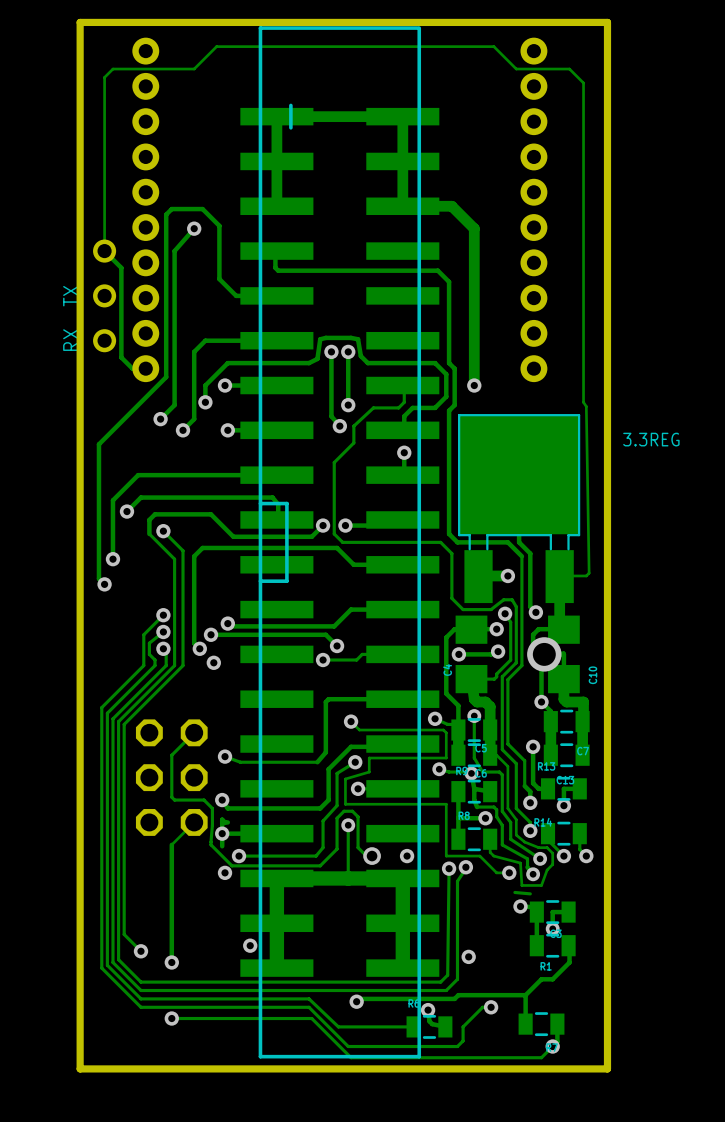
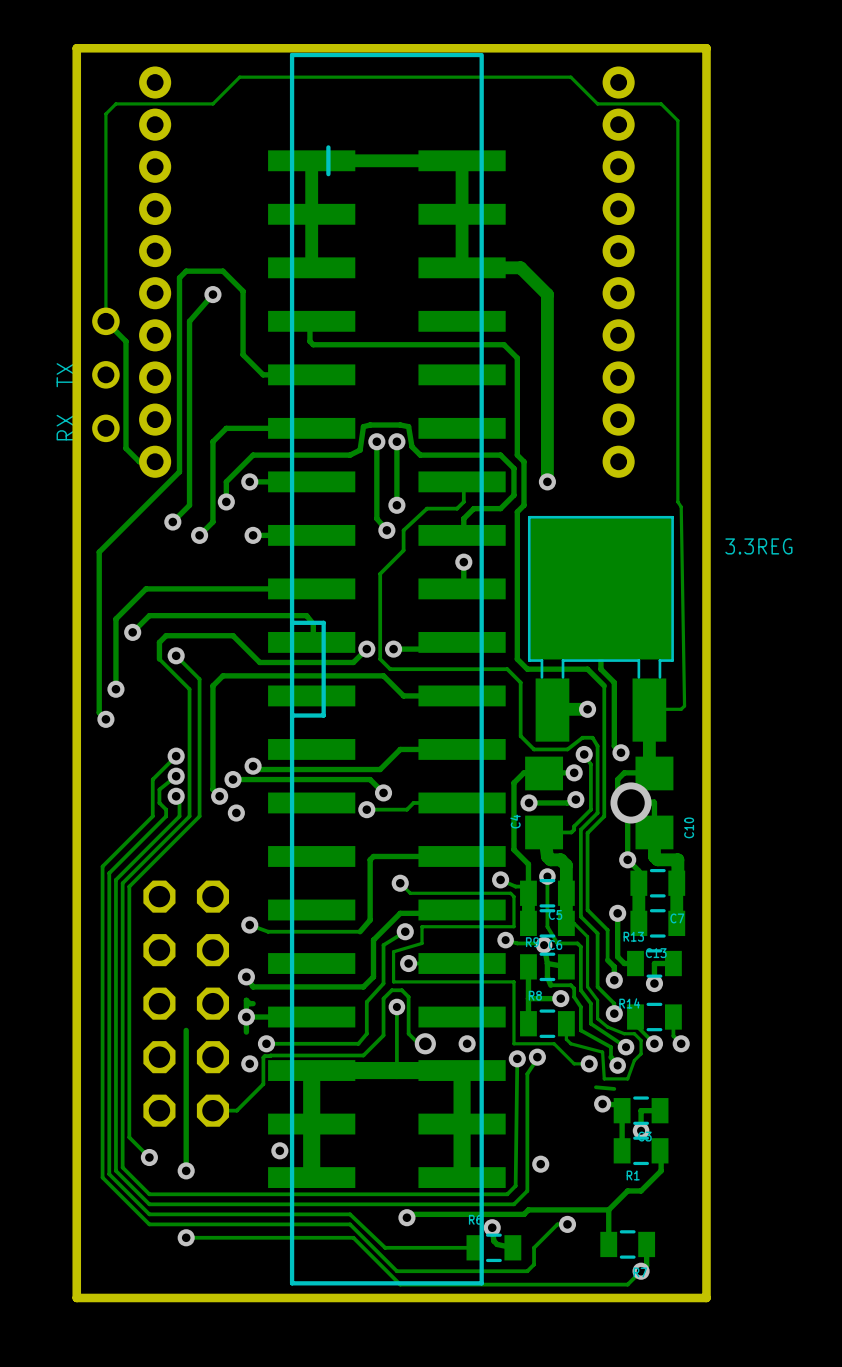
track: (194, 732) (171, 755) (171, 797) (174, 800) (204, 800) (212, 808) (211, 844) (232, 865) (242, 865) -> (213, 1110) (236, 1110) (263, 1084) (263, 1057) (270, 1055)
part: (171, 777) -> none
part: none -> (186, 1003)
track: (194, 822) (171, 844) -> none

